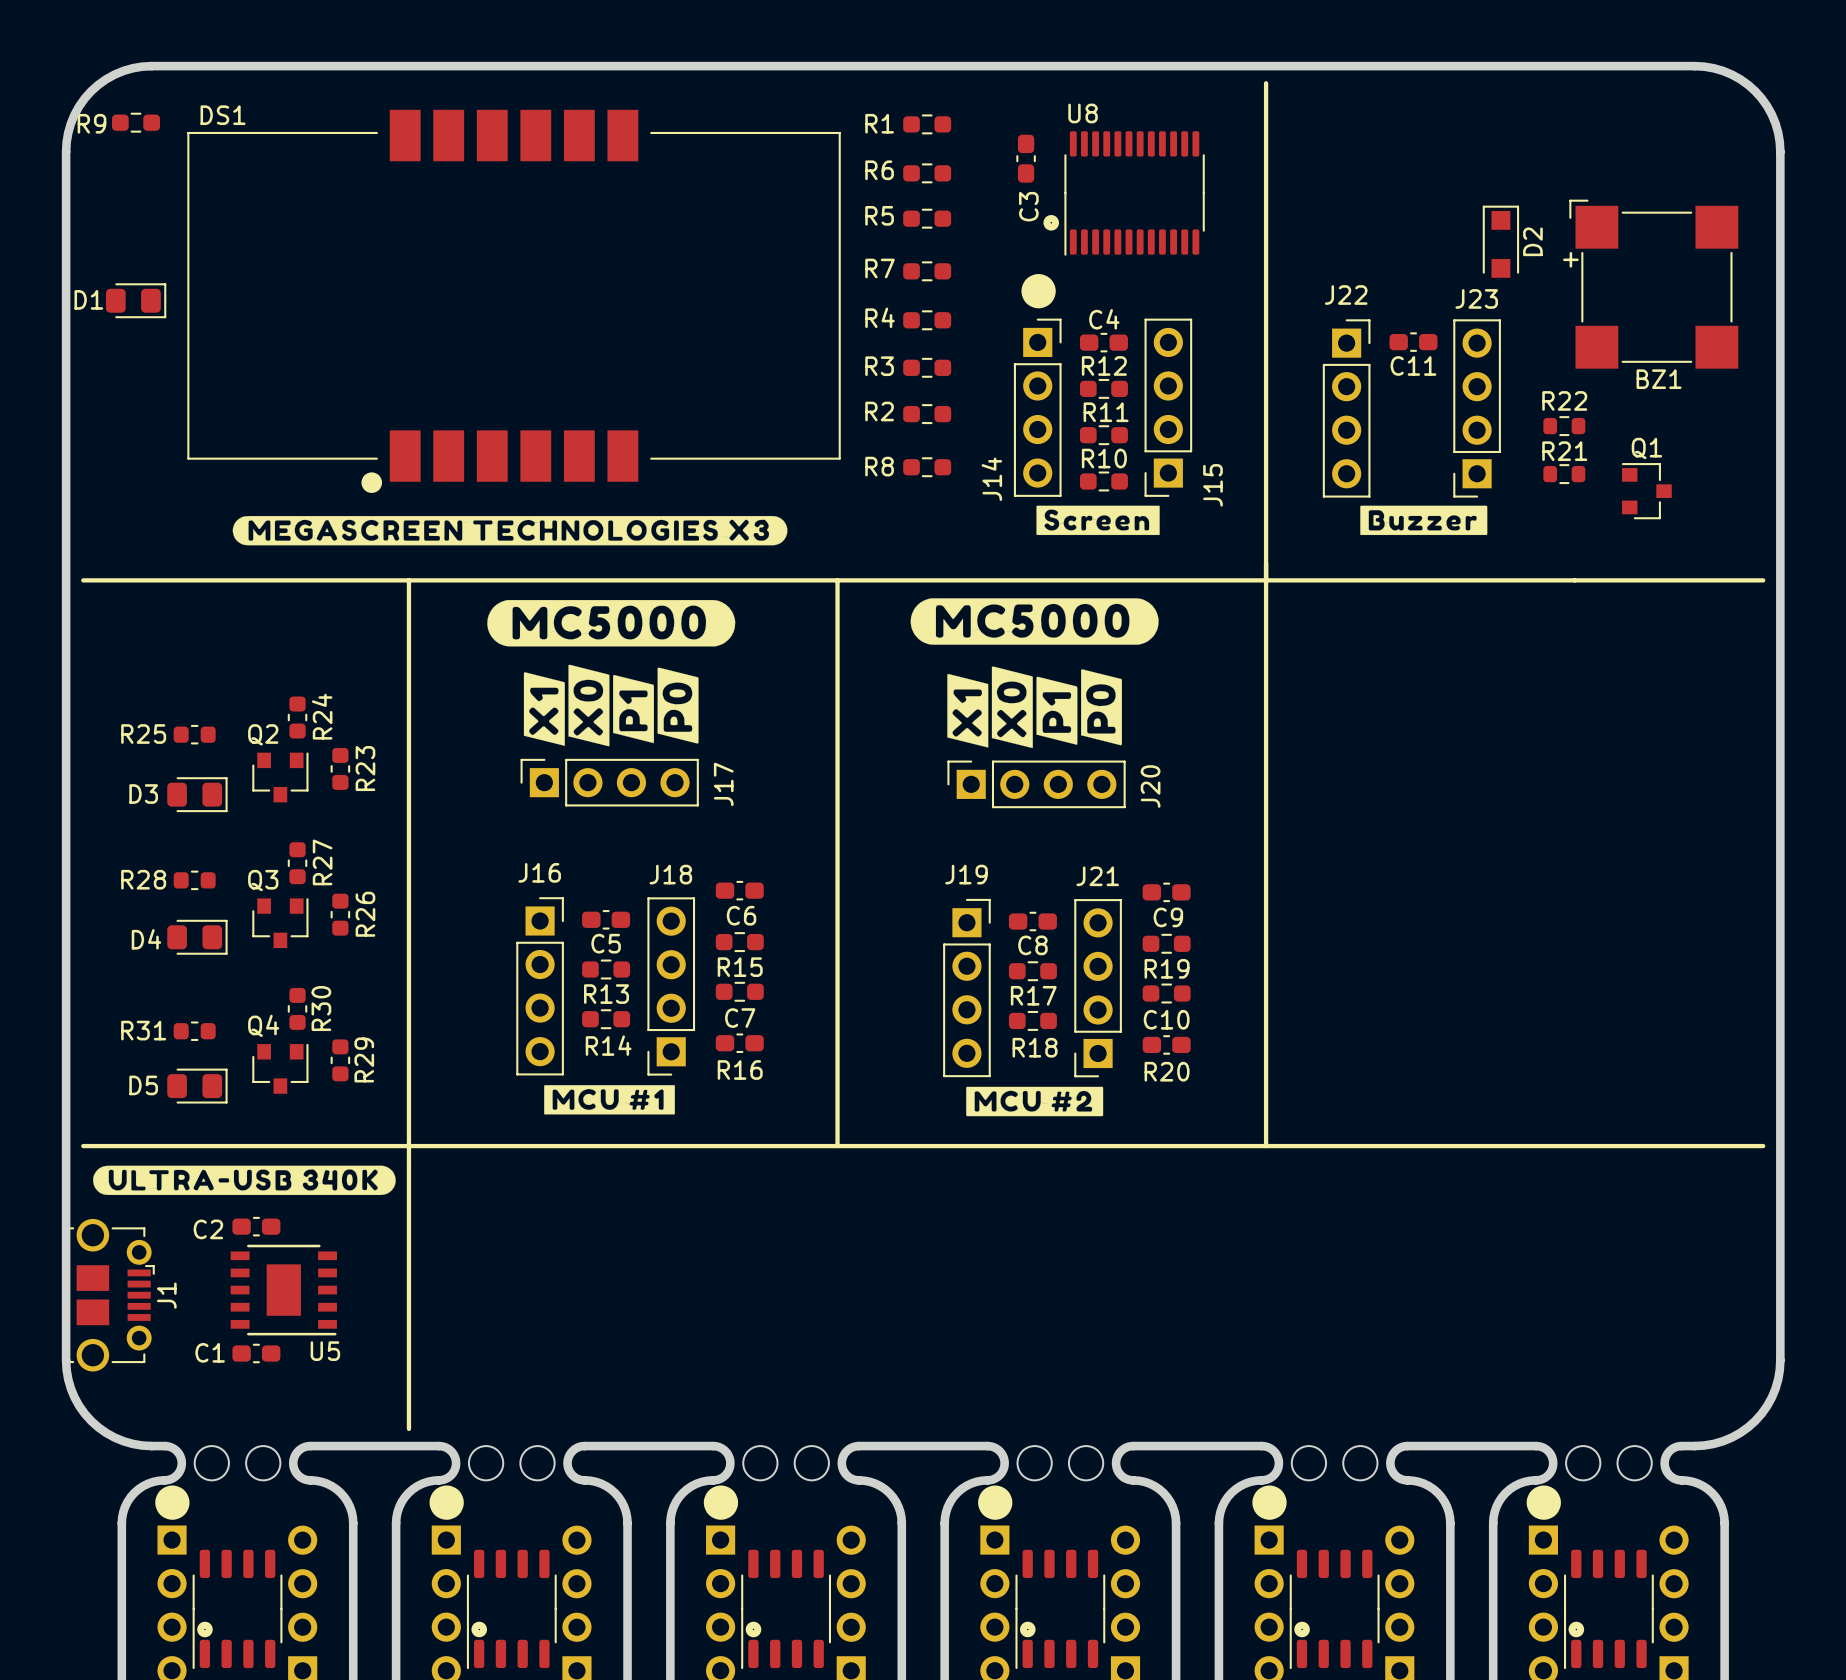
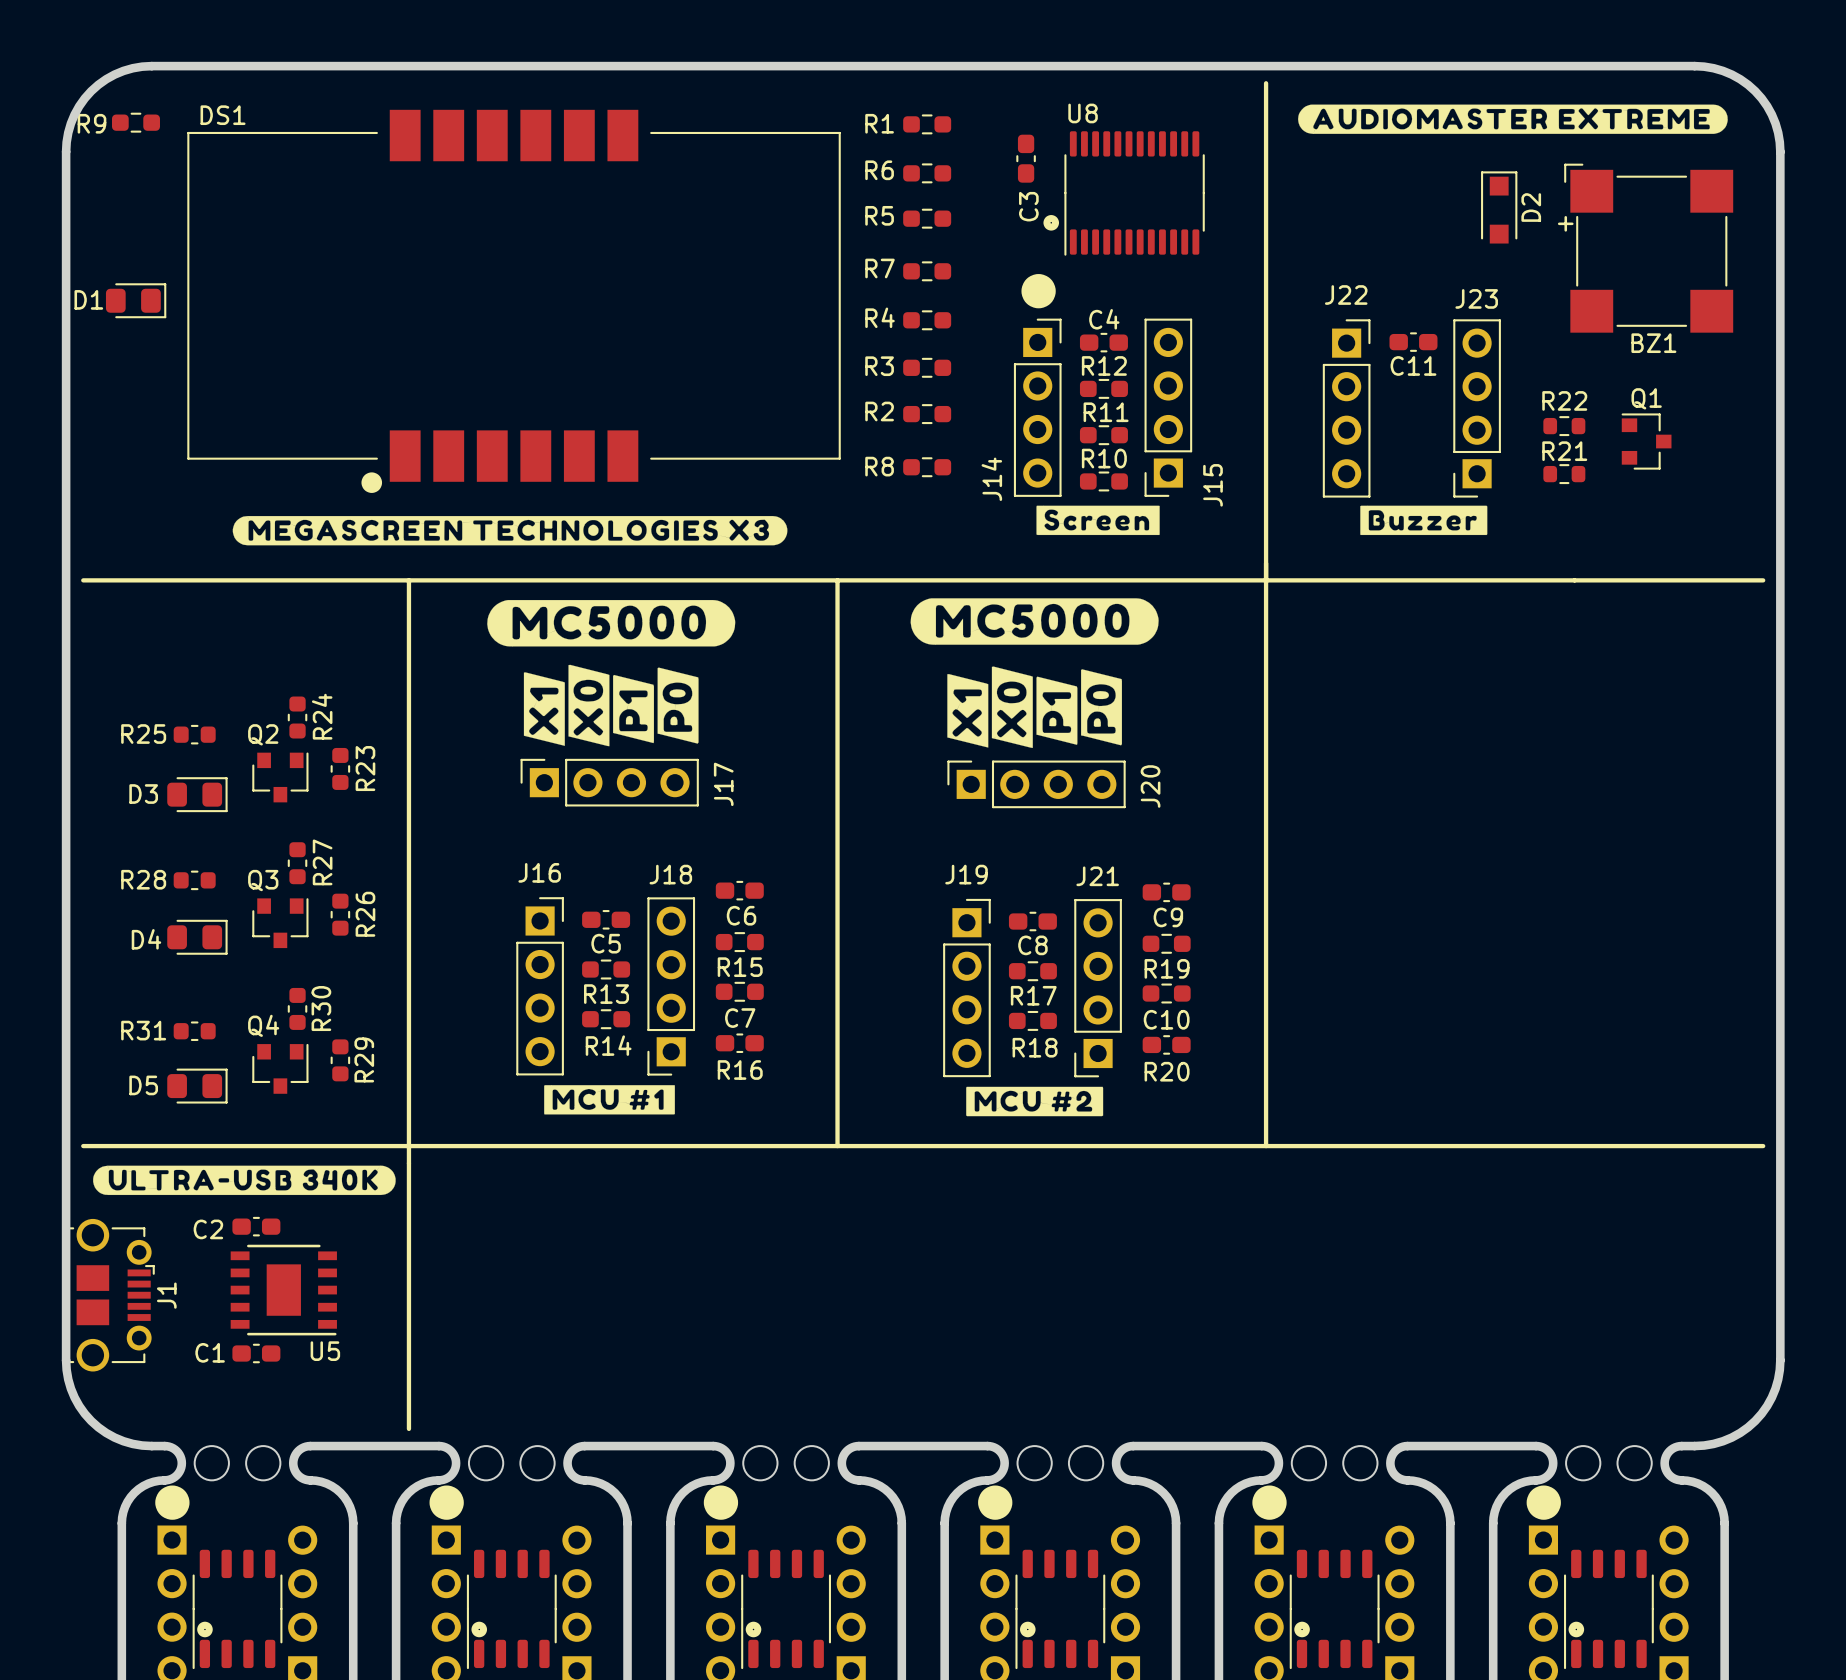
drawing: none -> [1298, 104, 1728, 134]
D2 position: (1500, 241) -> (1499, 207)
BZ1 position: (1653, 284) -> (1648, 248)
Q1 position: (1646, 491) -> (1646, 441)

